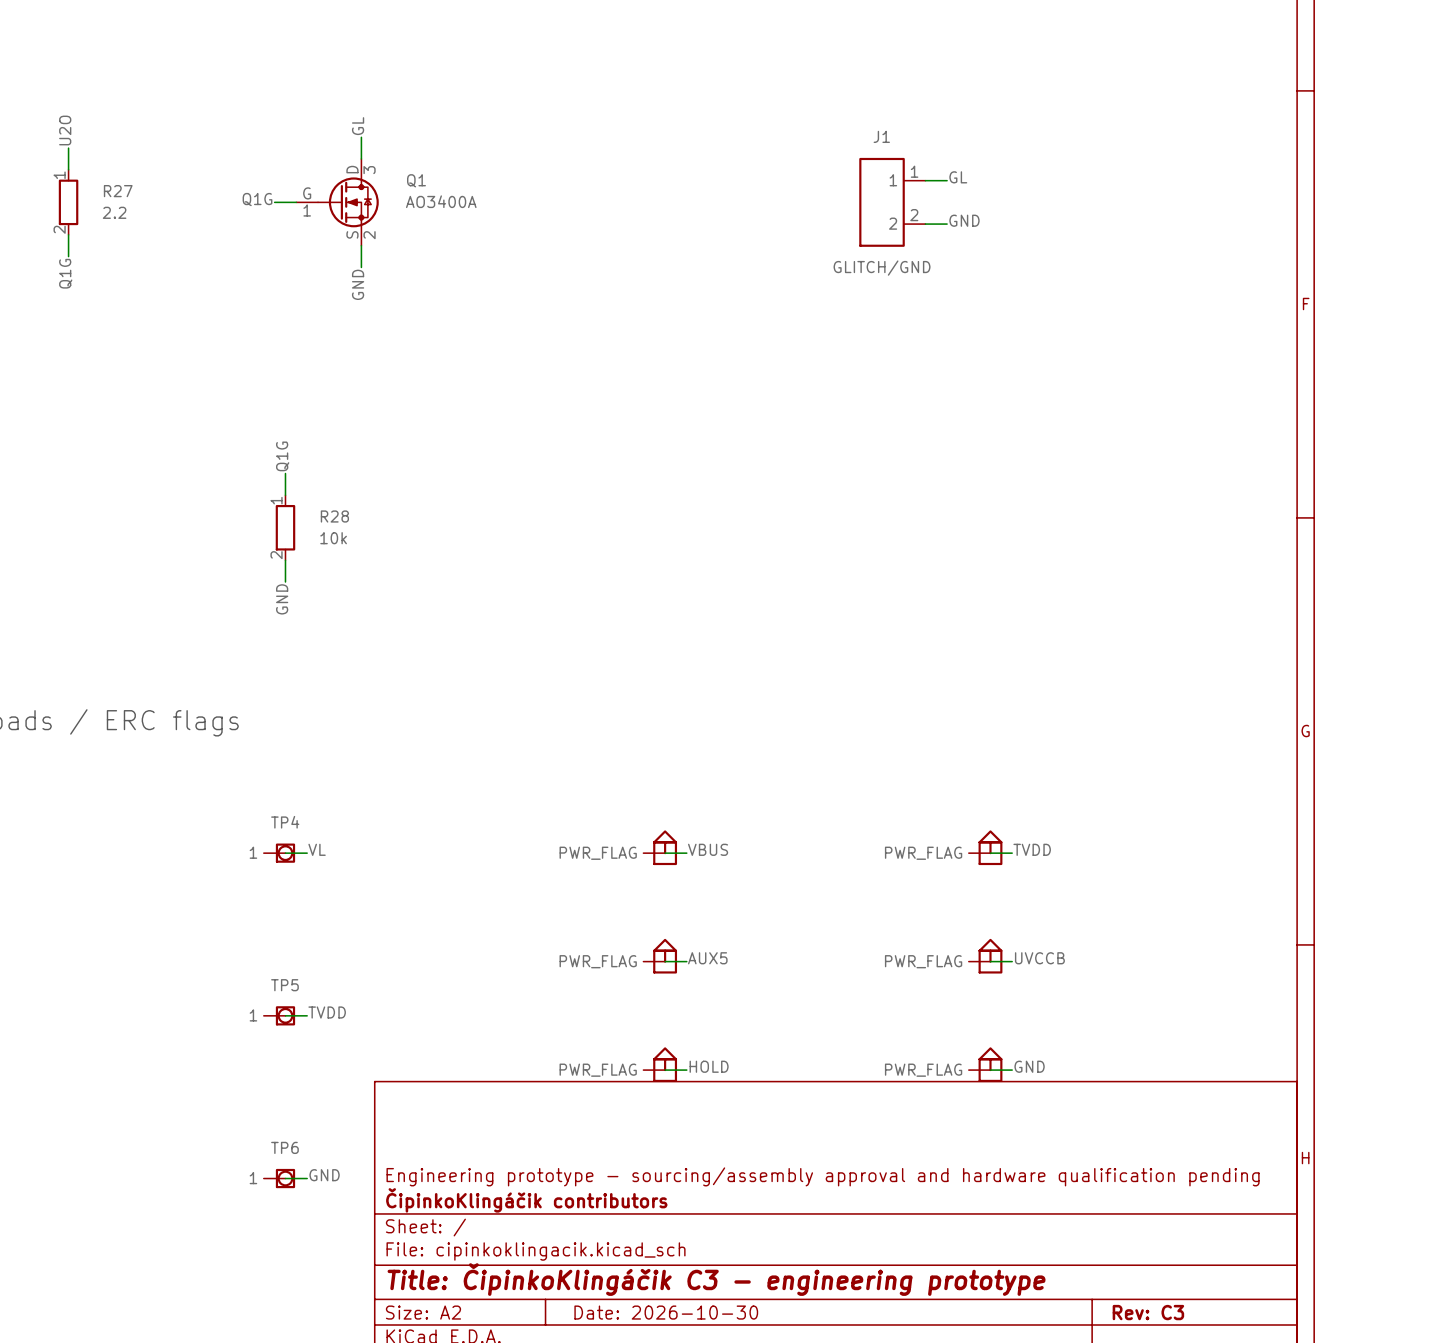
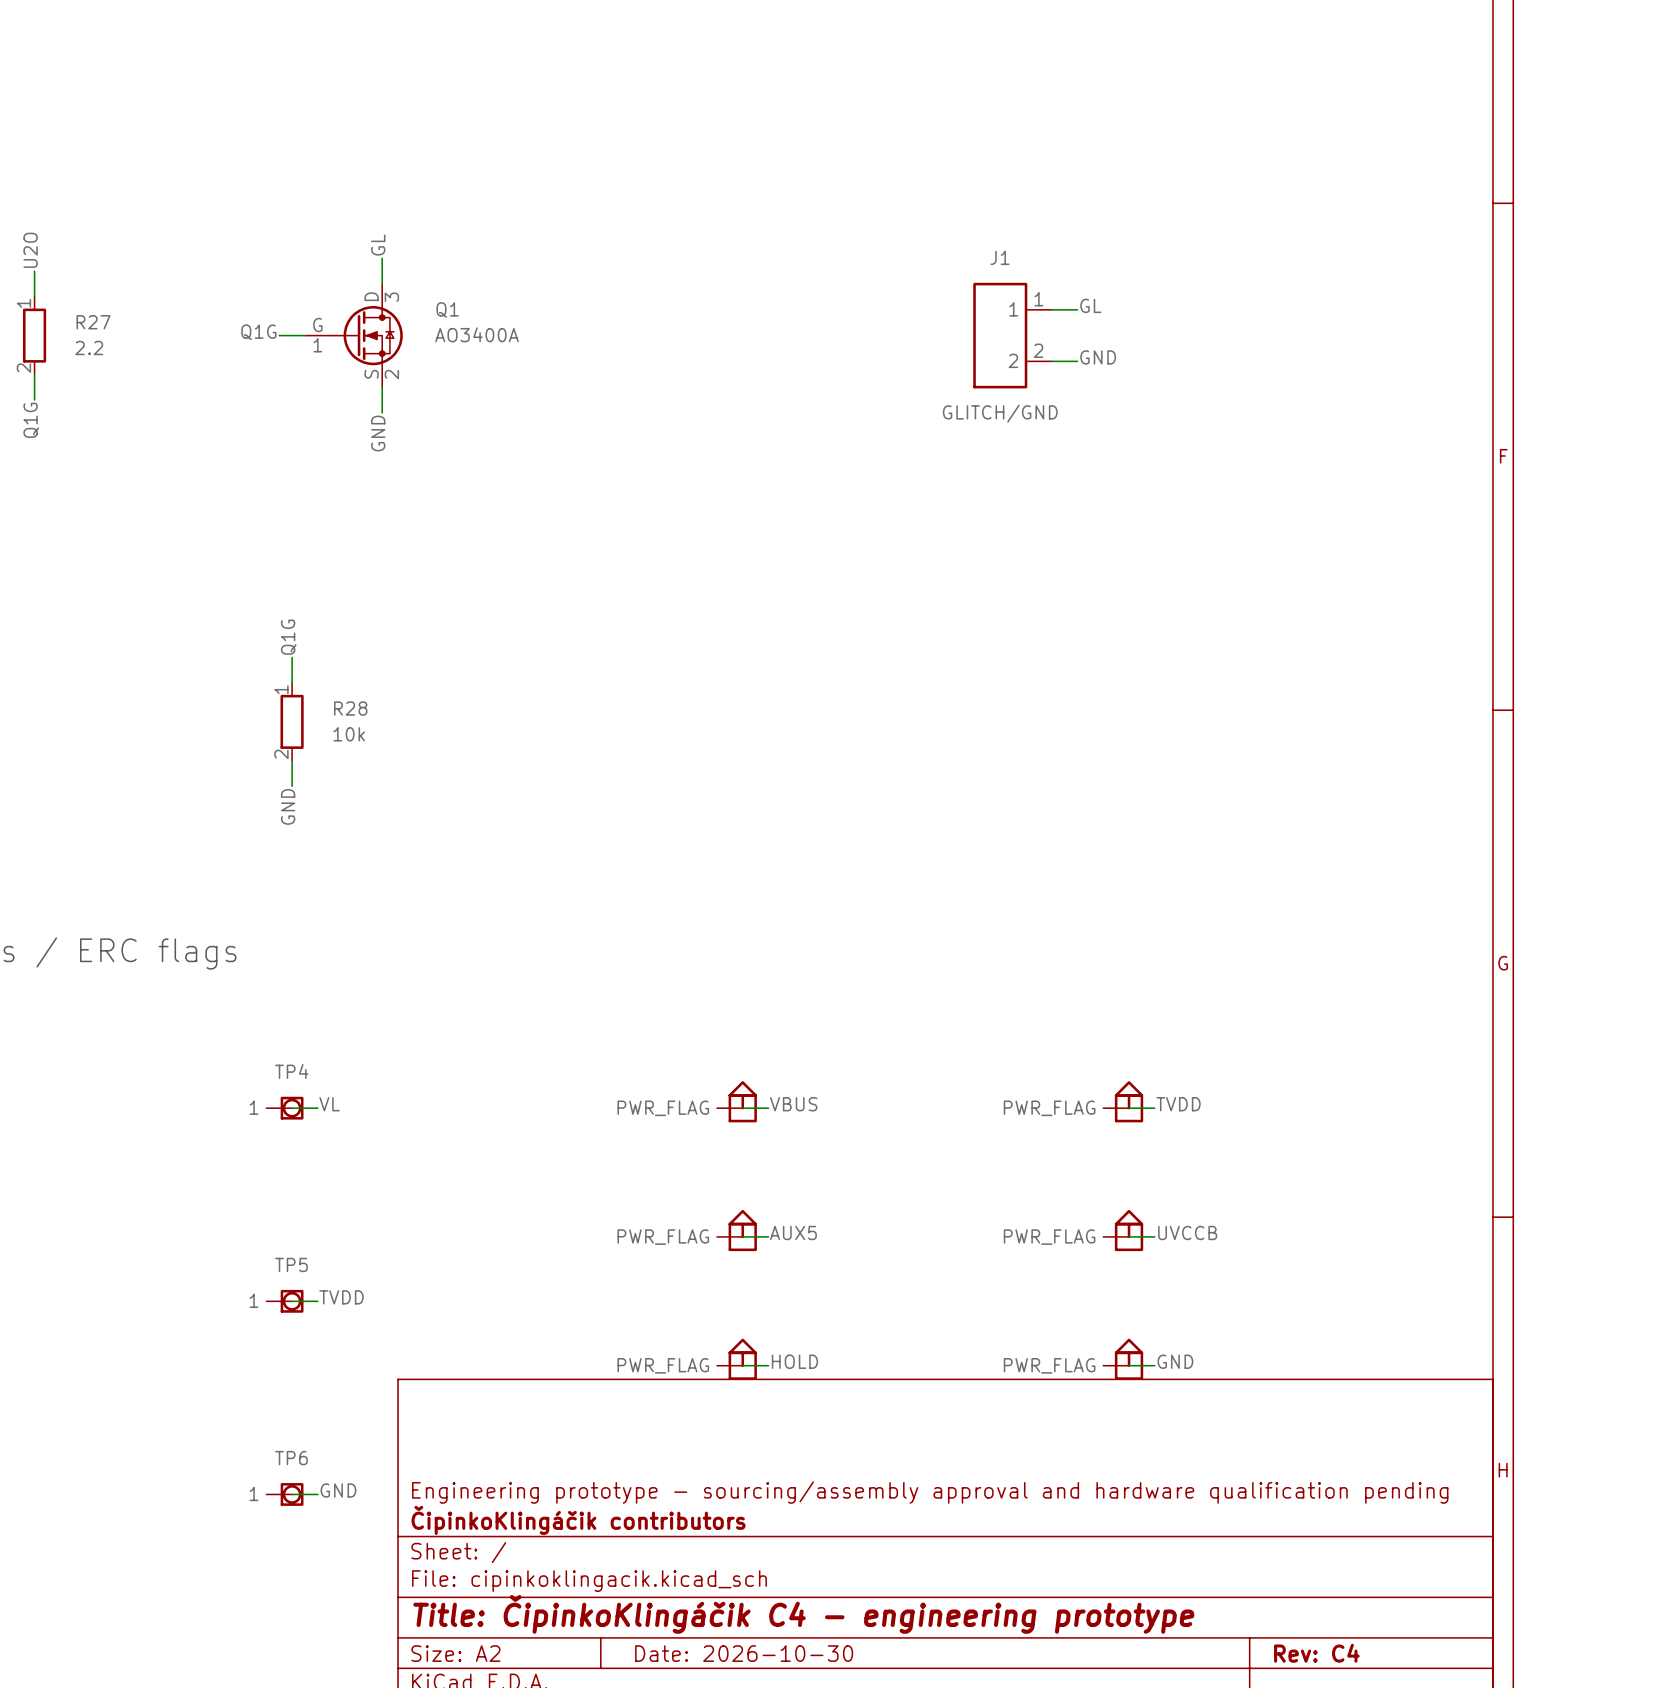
title block: Title: ČipinkoKlingáčik C3 - engineering prototype (716, 1279) -> Title: ČipinkoKlingáčik C4 - engineering prototype (803, 1614)
title block: Rev: C3 (1148, 1312) -> Rev: C4 (1316, 1653)

